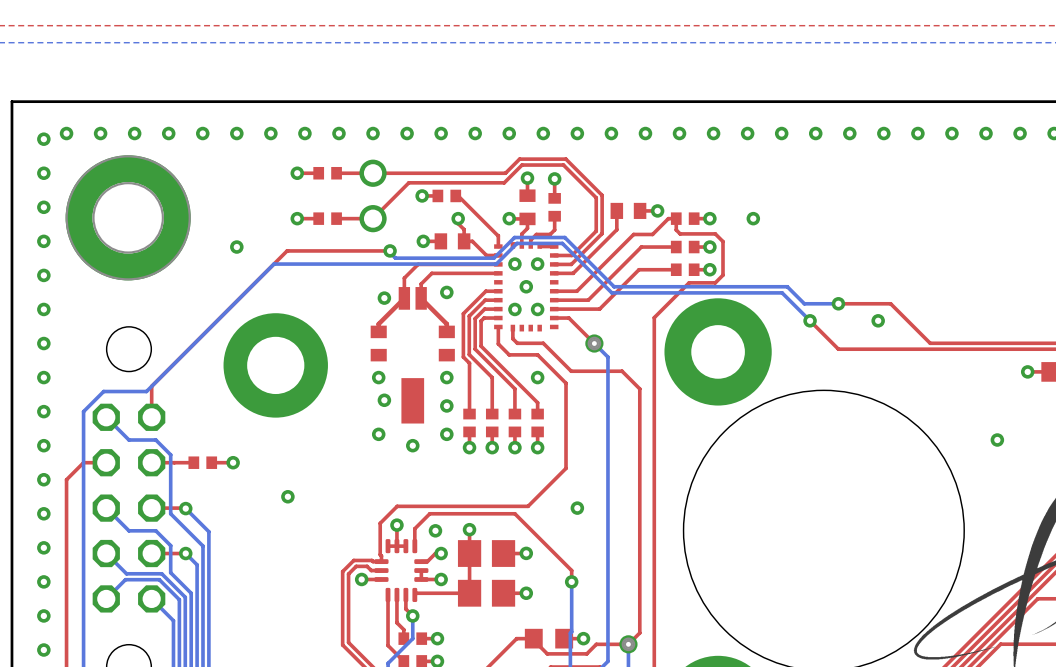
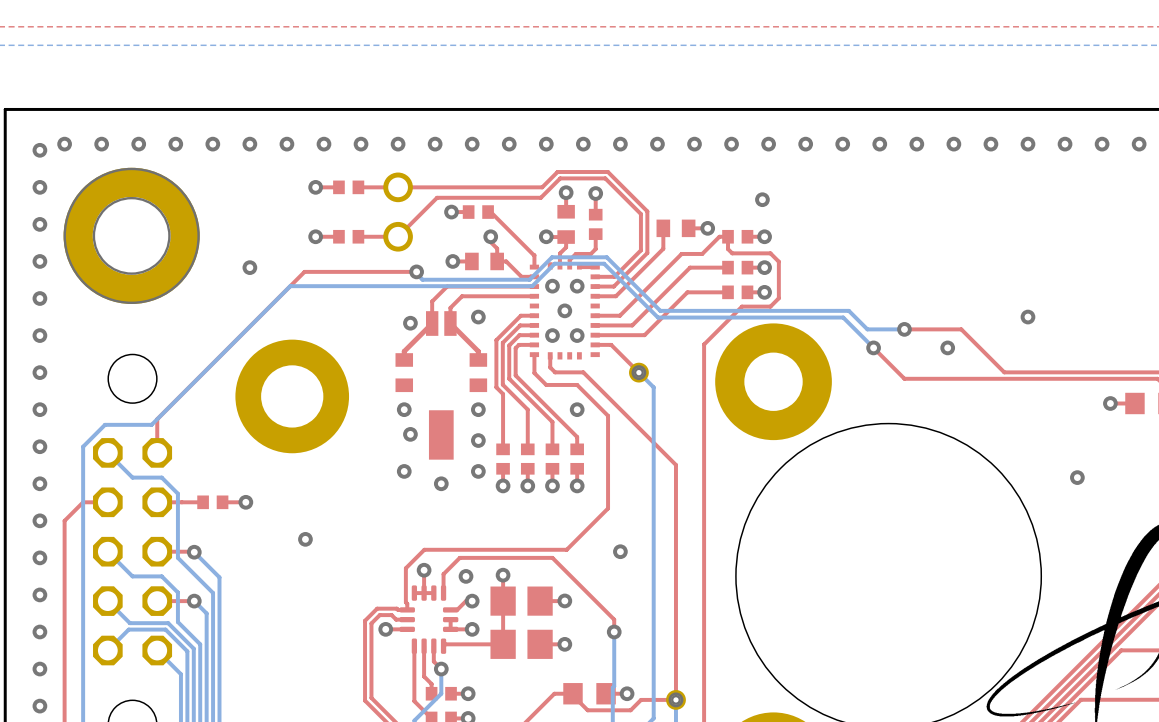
via position: (753, 218) -> (762, 199)
via: none -> (1027, 317)
top track: (571, 371) (622, 371) (639, 388) (639, 632) (628, 644) -> (613, 402) (675, 465) (675, 699)

